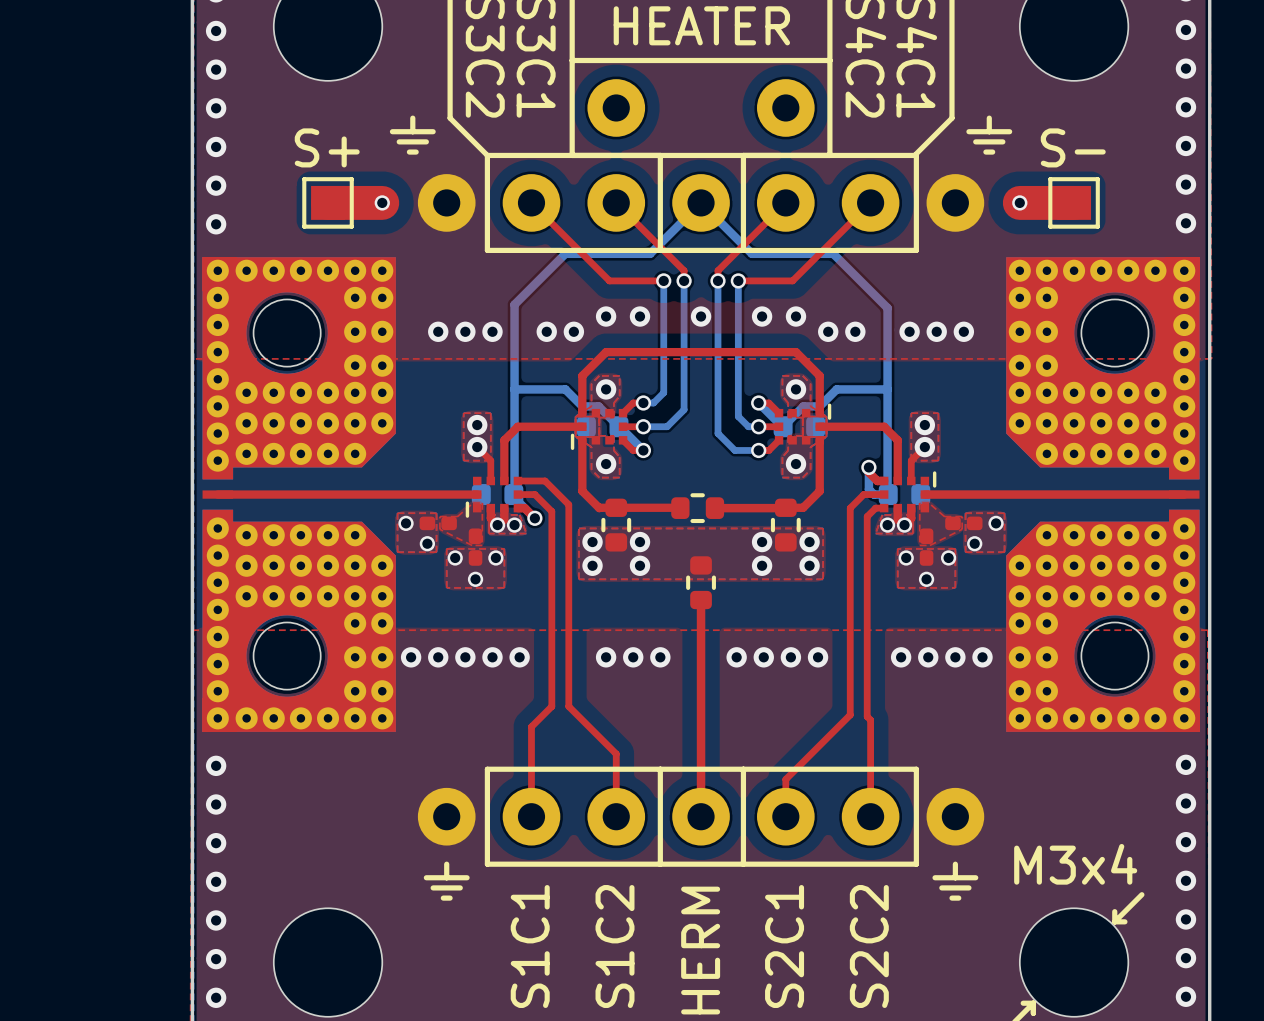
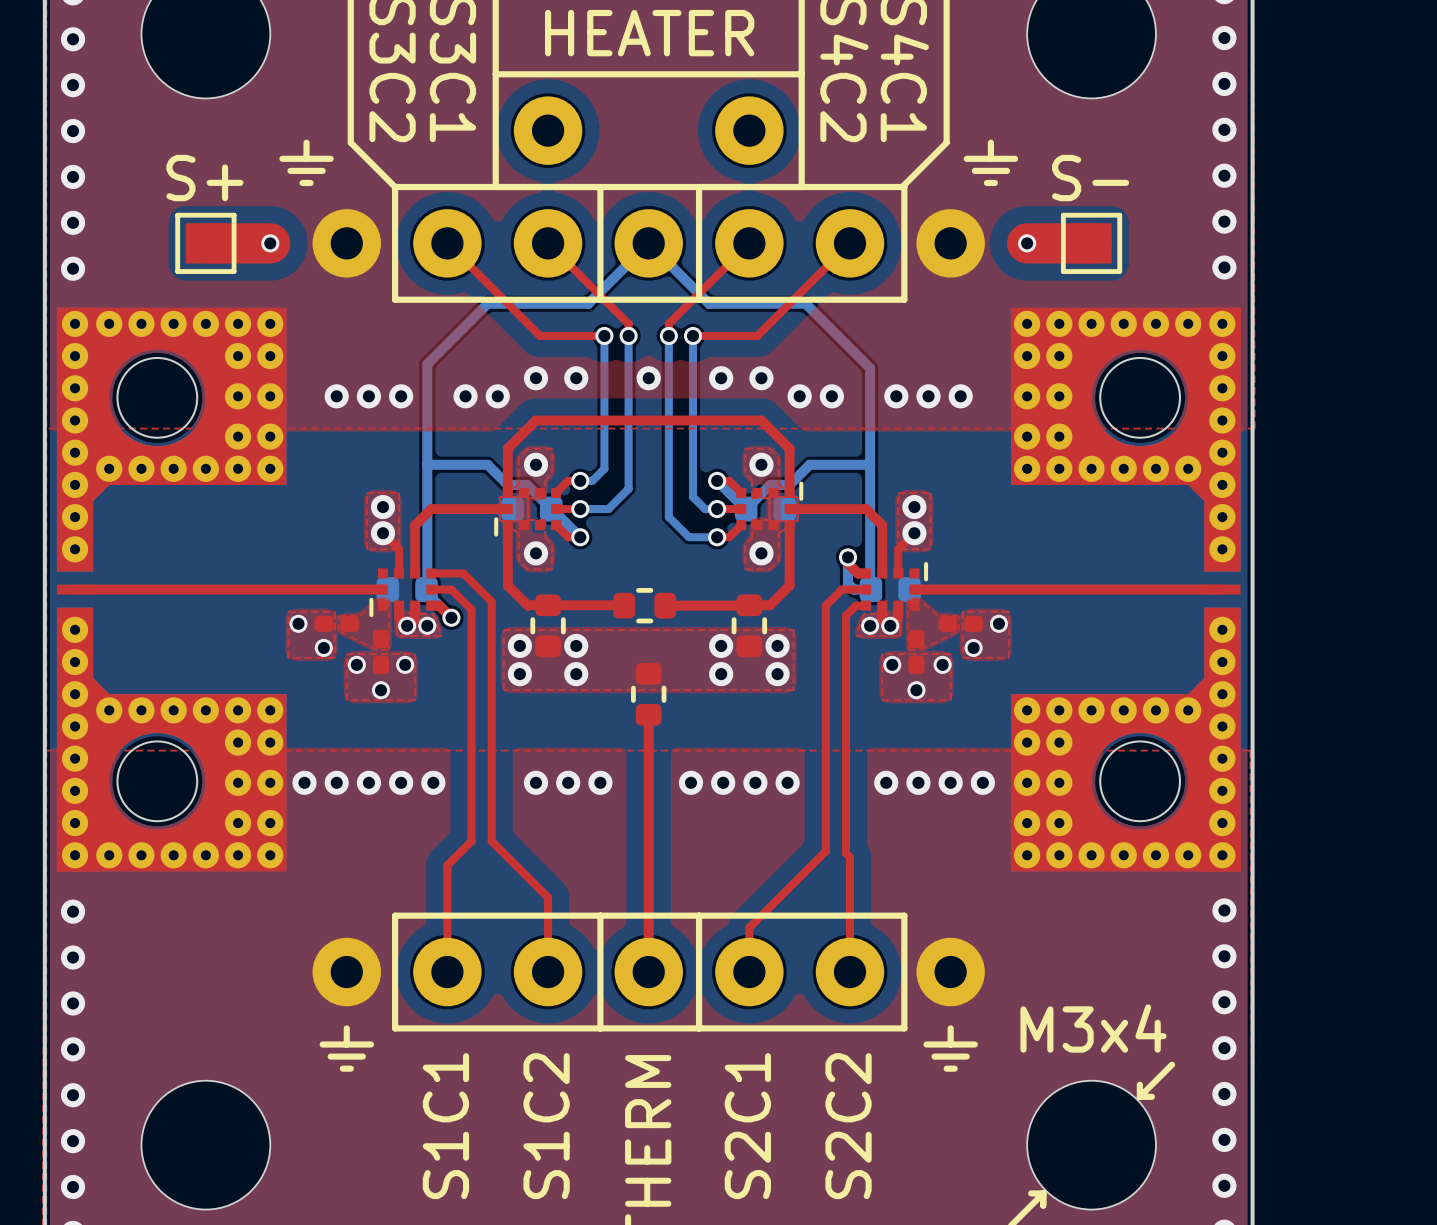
part footprint: [202, 257, 396, 732] -> [56, 307, 287, 872]
part footprint: [1006, 257, 1200, 732] -> [1011, 307, 1241, 872]

